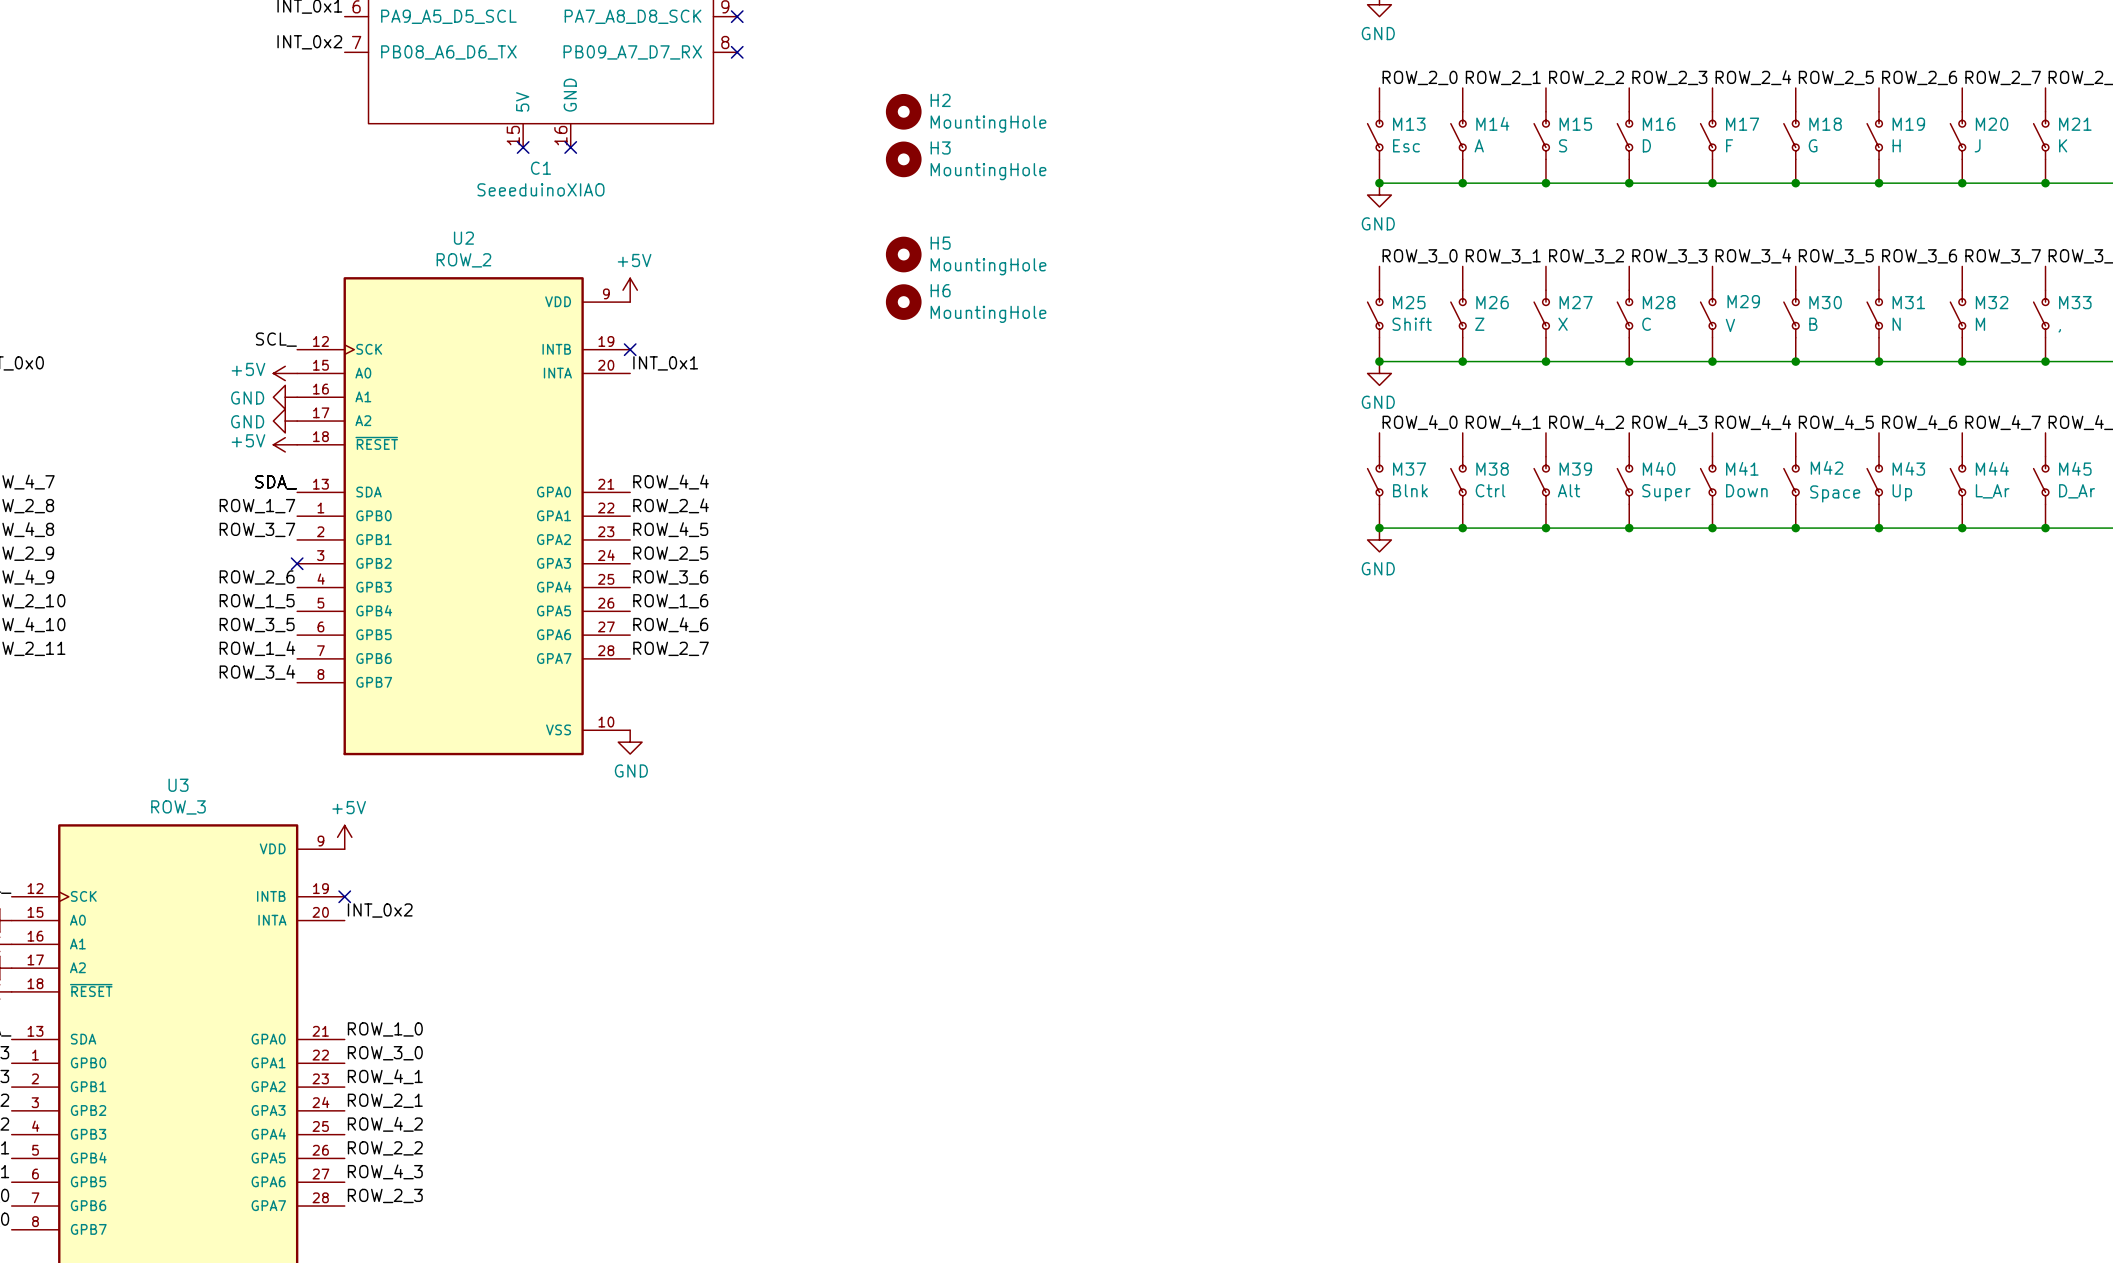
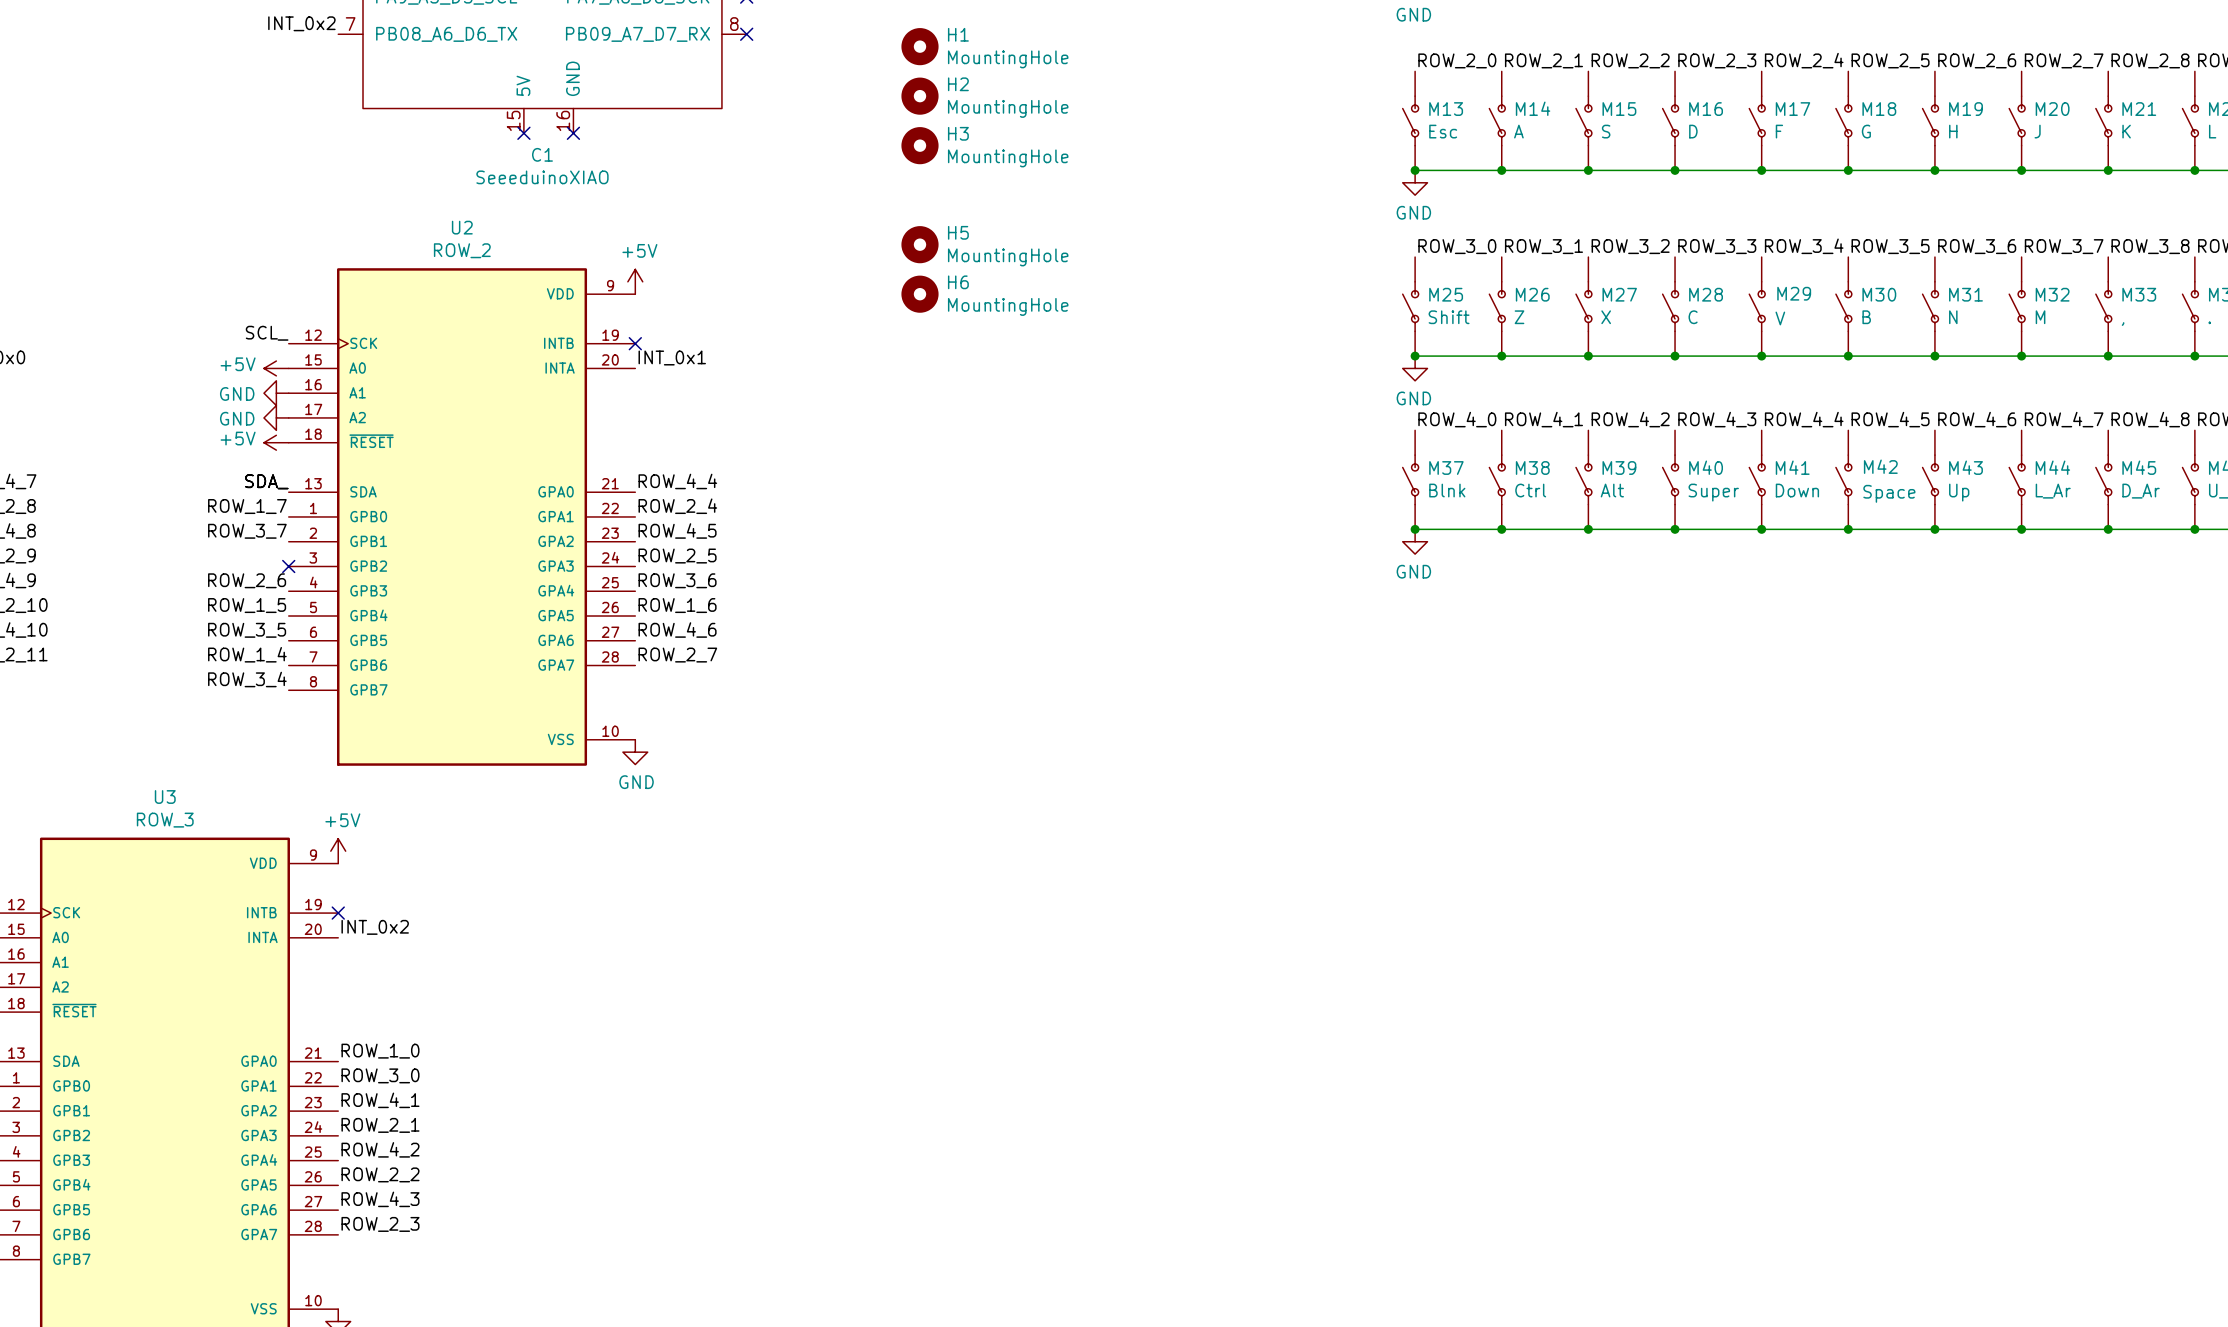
H1: none -> MountingHole (919, 46)

